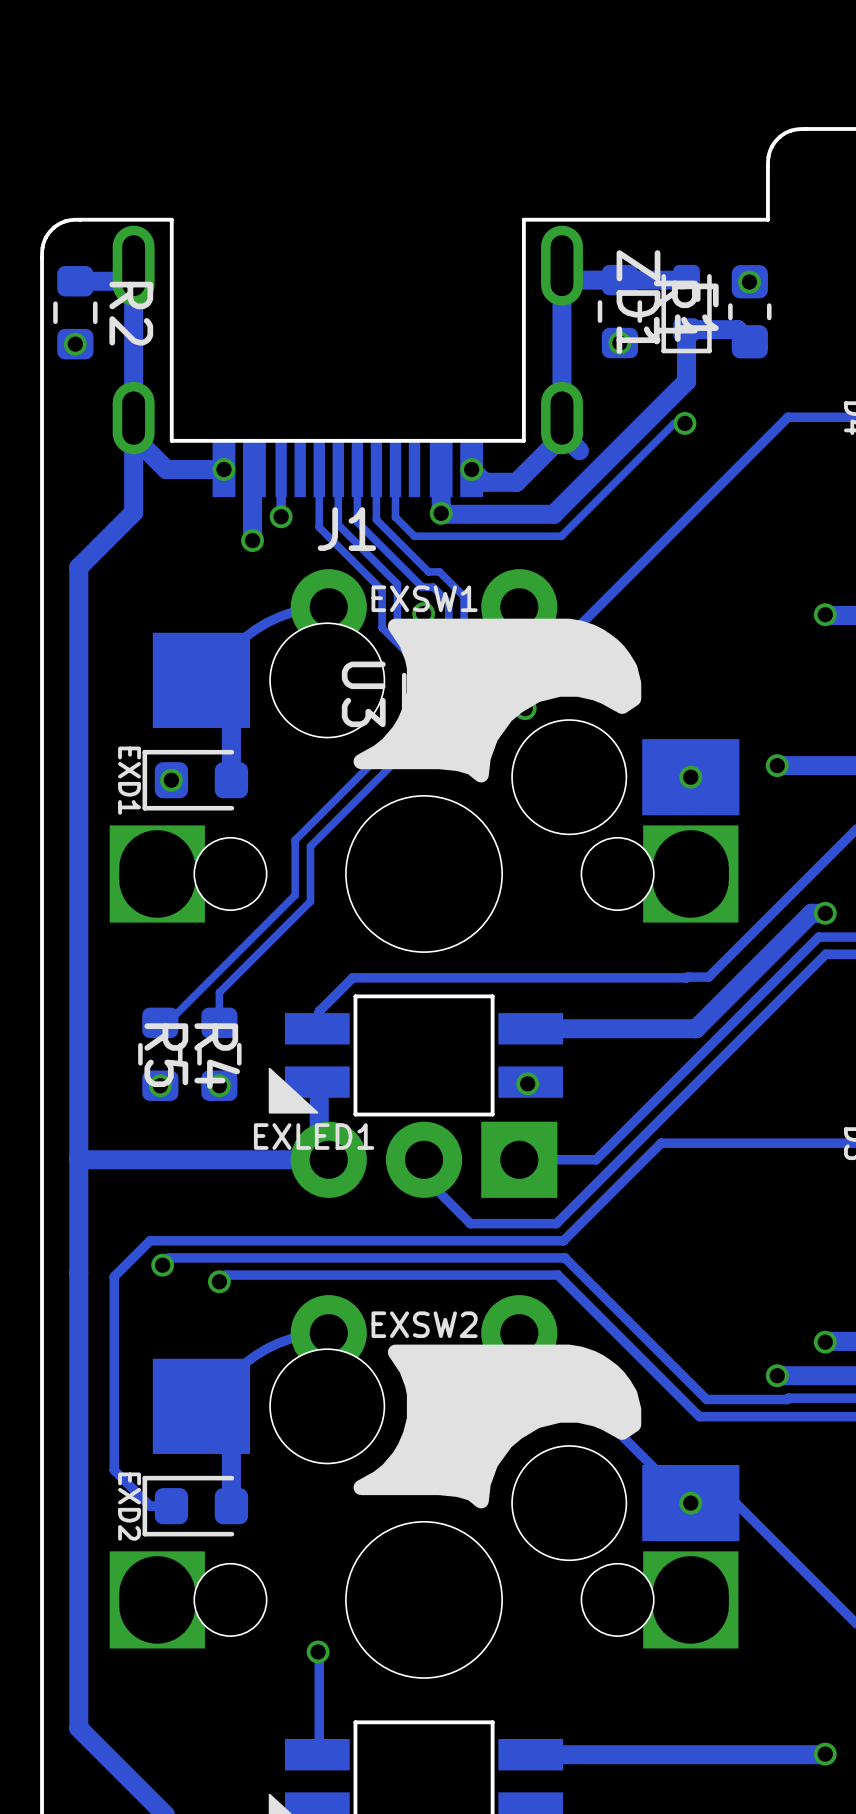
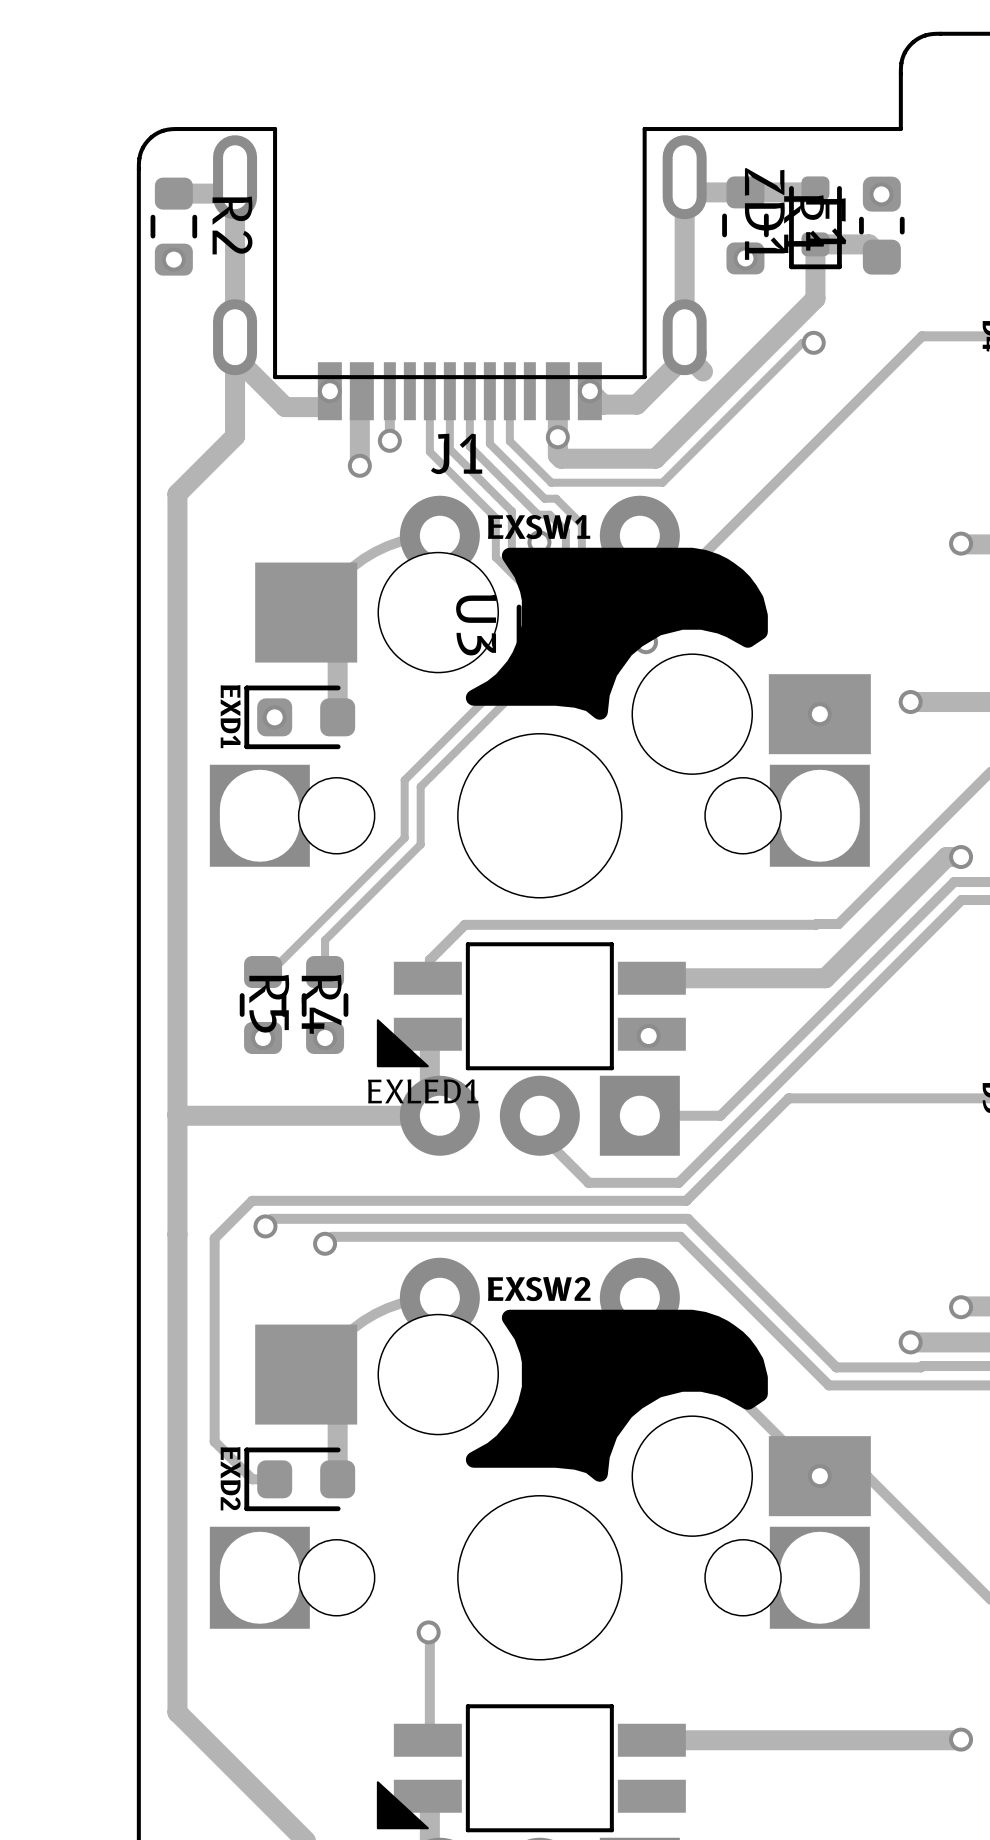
board edge: (523, 440) (171, 440) -> (644, 361) (644, 377) (275, 377) (275, 361)
track: (223, 469) (166, 469) -> (329, 407) (285, 407) (269, 391)
track: (441, 513) (553, 514) -> (557, 437) (557, 455) (561, 458) (655, 458) (675, 438)
track: (561, 536) (414, 536) -> (684, 461) (662, 482) (551, 482) (529, 461)

